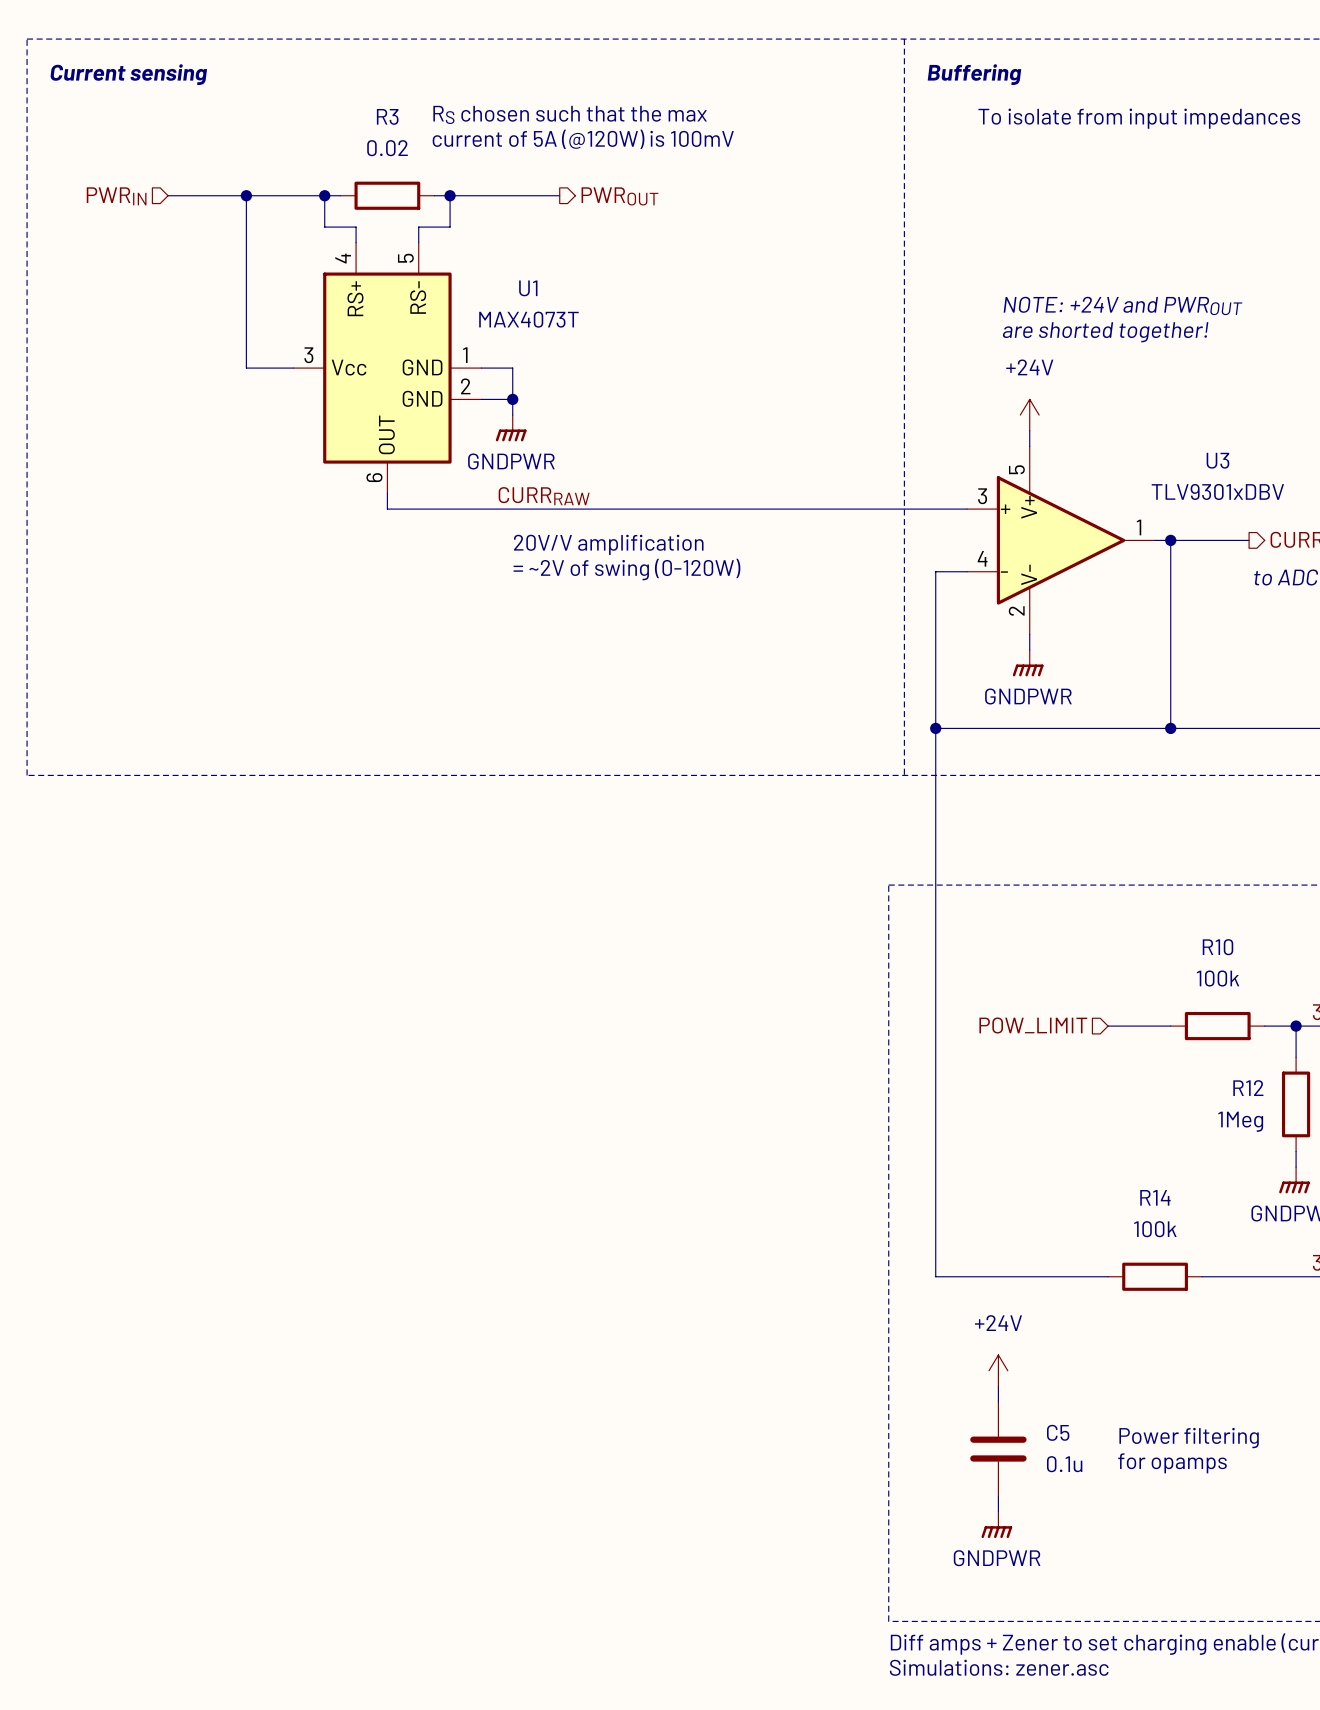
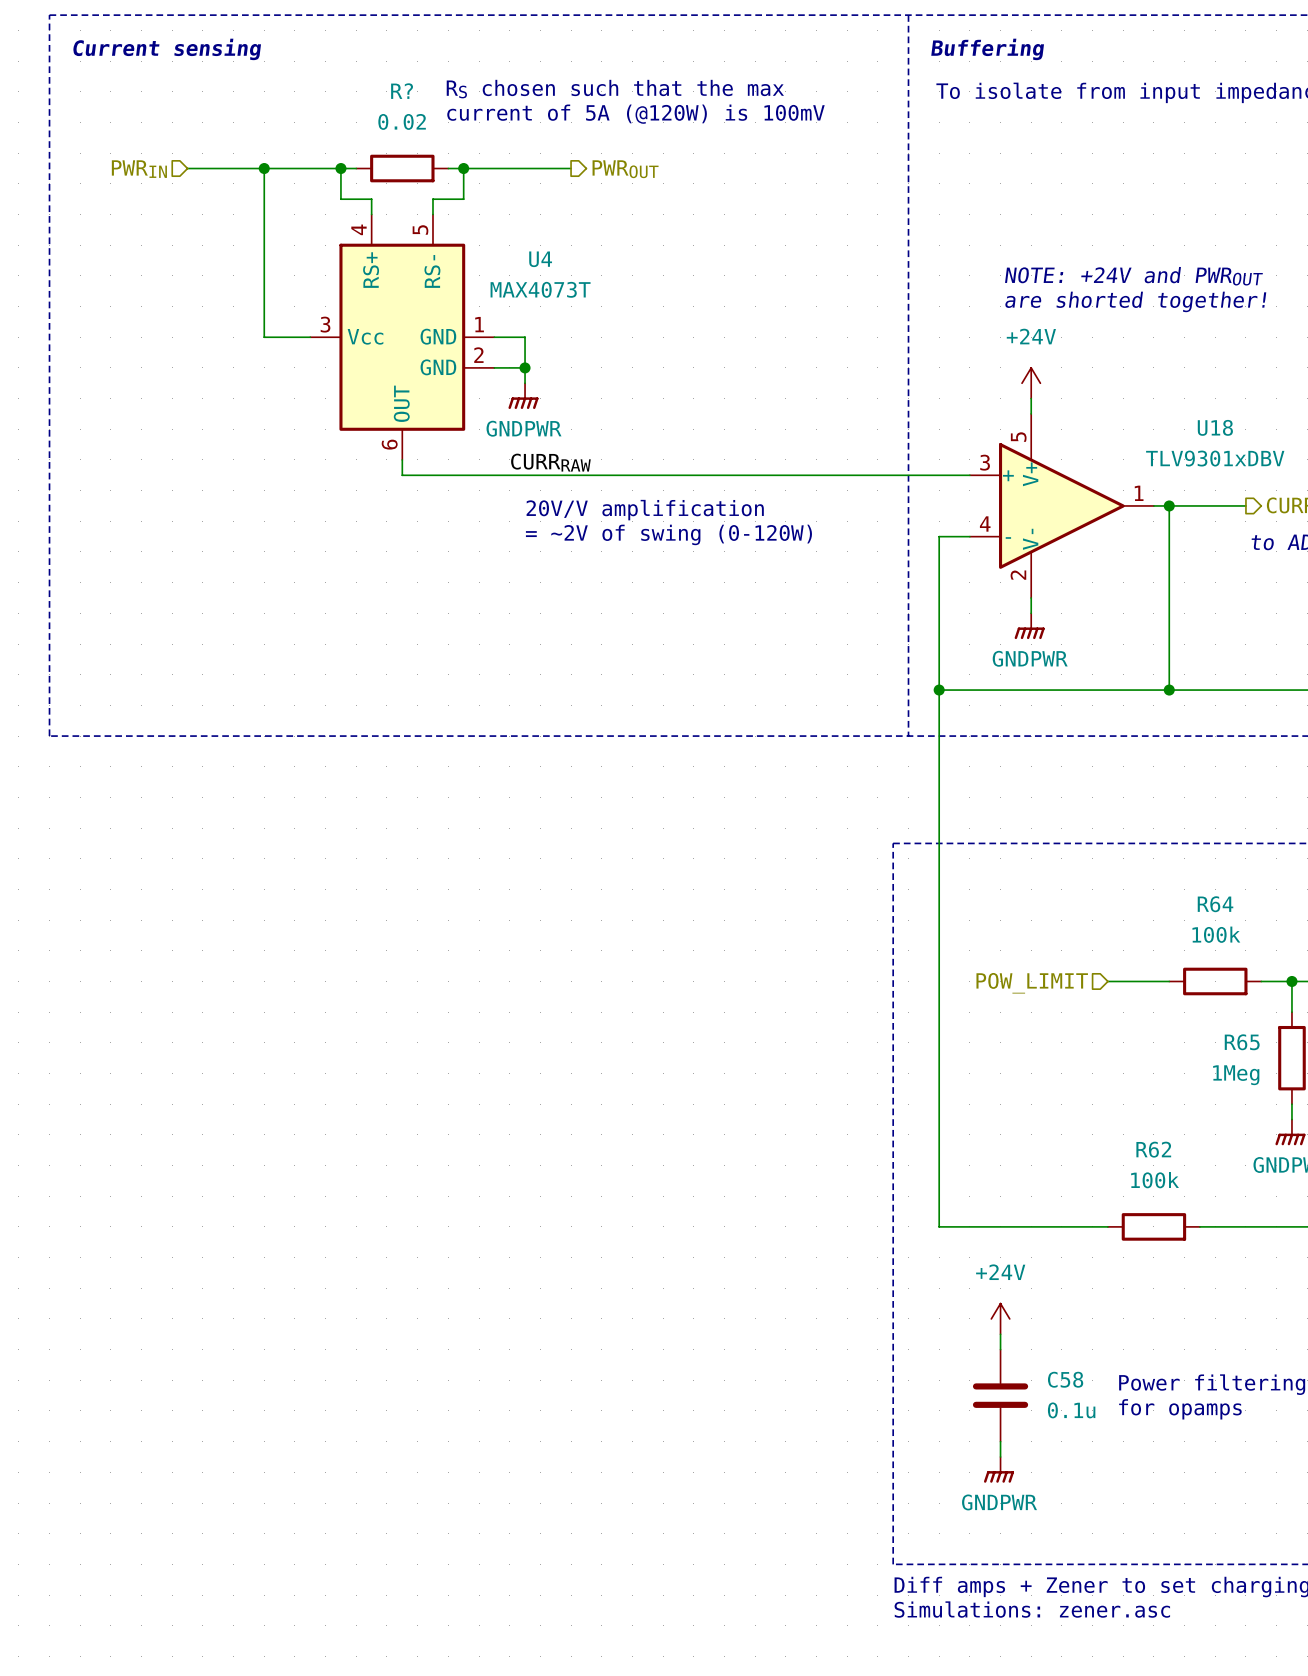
R3 name: R3 (387, 116) -> R? (402, 91)
U1 name: U1 (528, 288) -> U4 (540, 259)
U3 name: U3 (1217, 460) -> U18 (1215, 427)
R10 name: R10 (1217, 947) -> R64 (1215, 904)
R12 name: R12 (1248, 1088) -> R65 (1242, 1042)
R14 name: R14 (1155, 1197) -> R62 (1153, 1149)
C5 name: C5 (1058, 1432) -> C58 (1065, 1379)

